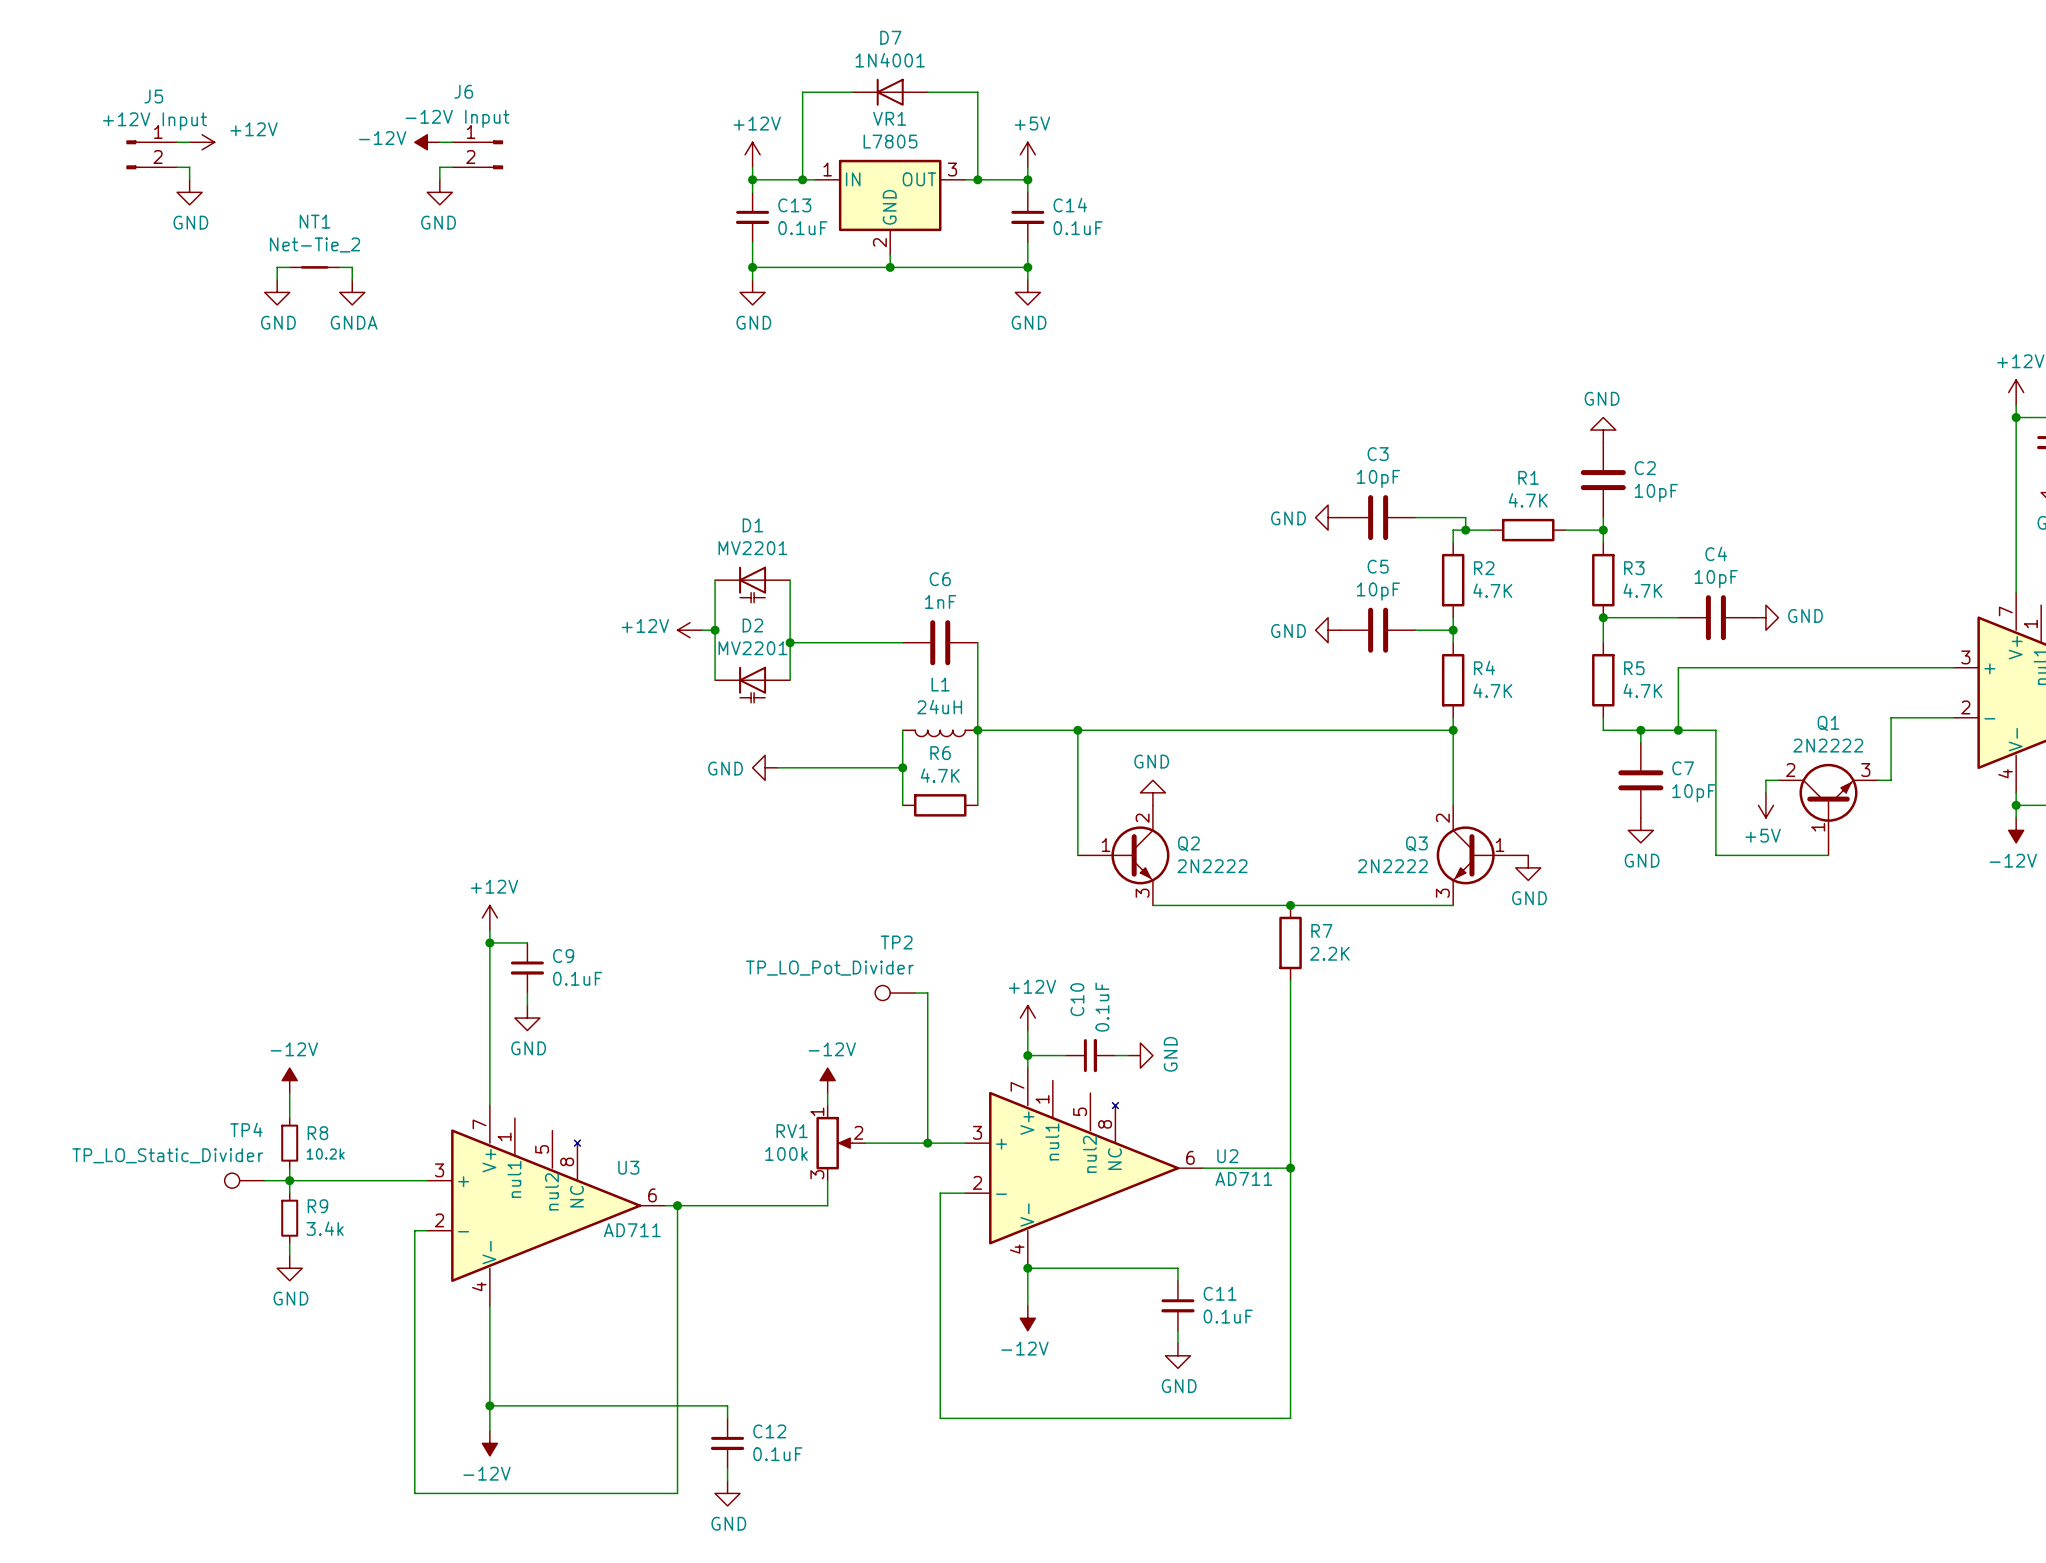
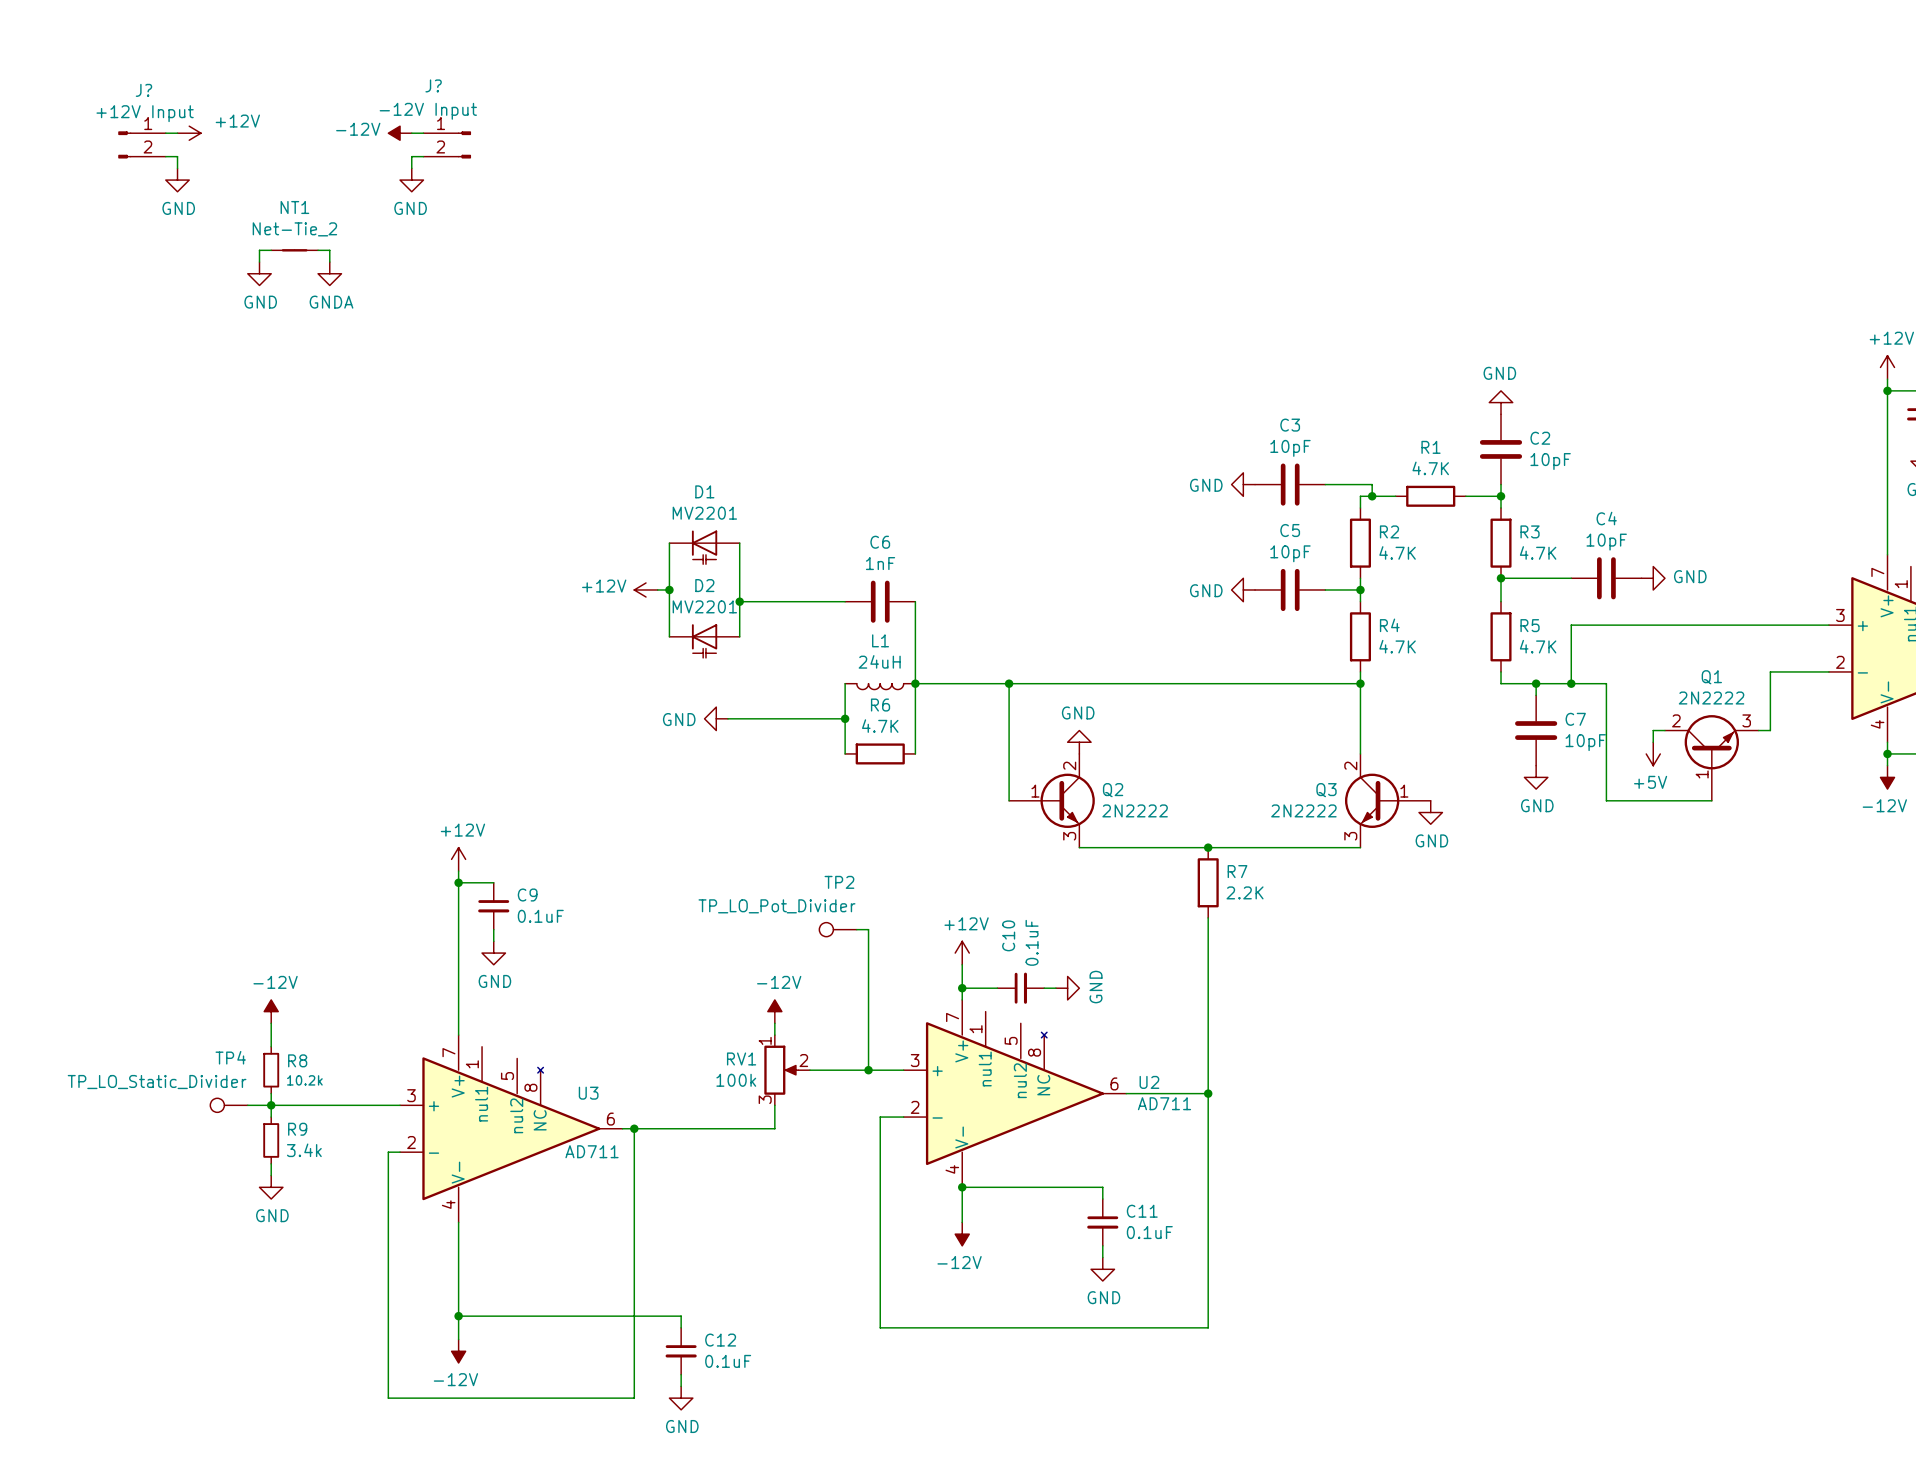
J6 name: J6 (463, 91) -> J? (433, 85)
wire: (852, 92) (802, 92) (802, 179) -> none
D7: 1N4001 (890, 92) -> none
wire: (927, 92) (977, 92) (977, 179) -> none
J5 name: J5 (153, 96) -> J? (143, 90)
power symbol: +12V (752, 154) -> none
power symbol: +5V (1027, 154) -> none
wire: (752, 167) (752, 192) -> none
wire: (1027, 167) (1027, 192) -> none
wire: (752, 179) (815, 179) -> none
junction: (752, 179) -> none
junction: (802, 179) -> none
wire: (965, 179) (1027, 179) -> none
junction: (977, 179) -> none
junction: (1027, 179) -> none
VR1: L7805 (890, 207) -> none
C13: 0.1uF (752, 217) -> none
C14: 0.1uF (1027, 217) -> none
wire: (752, 242) (752, 279) -> none
wire: (1027, 242) (1027, 279) -> none
wire: (890, 254) (890, 267) -> none
wire: (752, 267) (1027, 267) -> none
junction: (752, 267) -> none
junction: (890, 267) -> none
junction: (1027, 267) -> none
power symbol: GND (752, 292) -> none
power symbol: GND (1027, 292) -> none

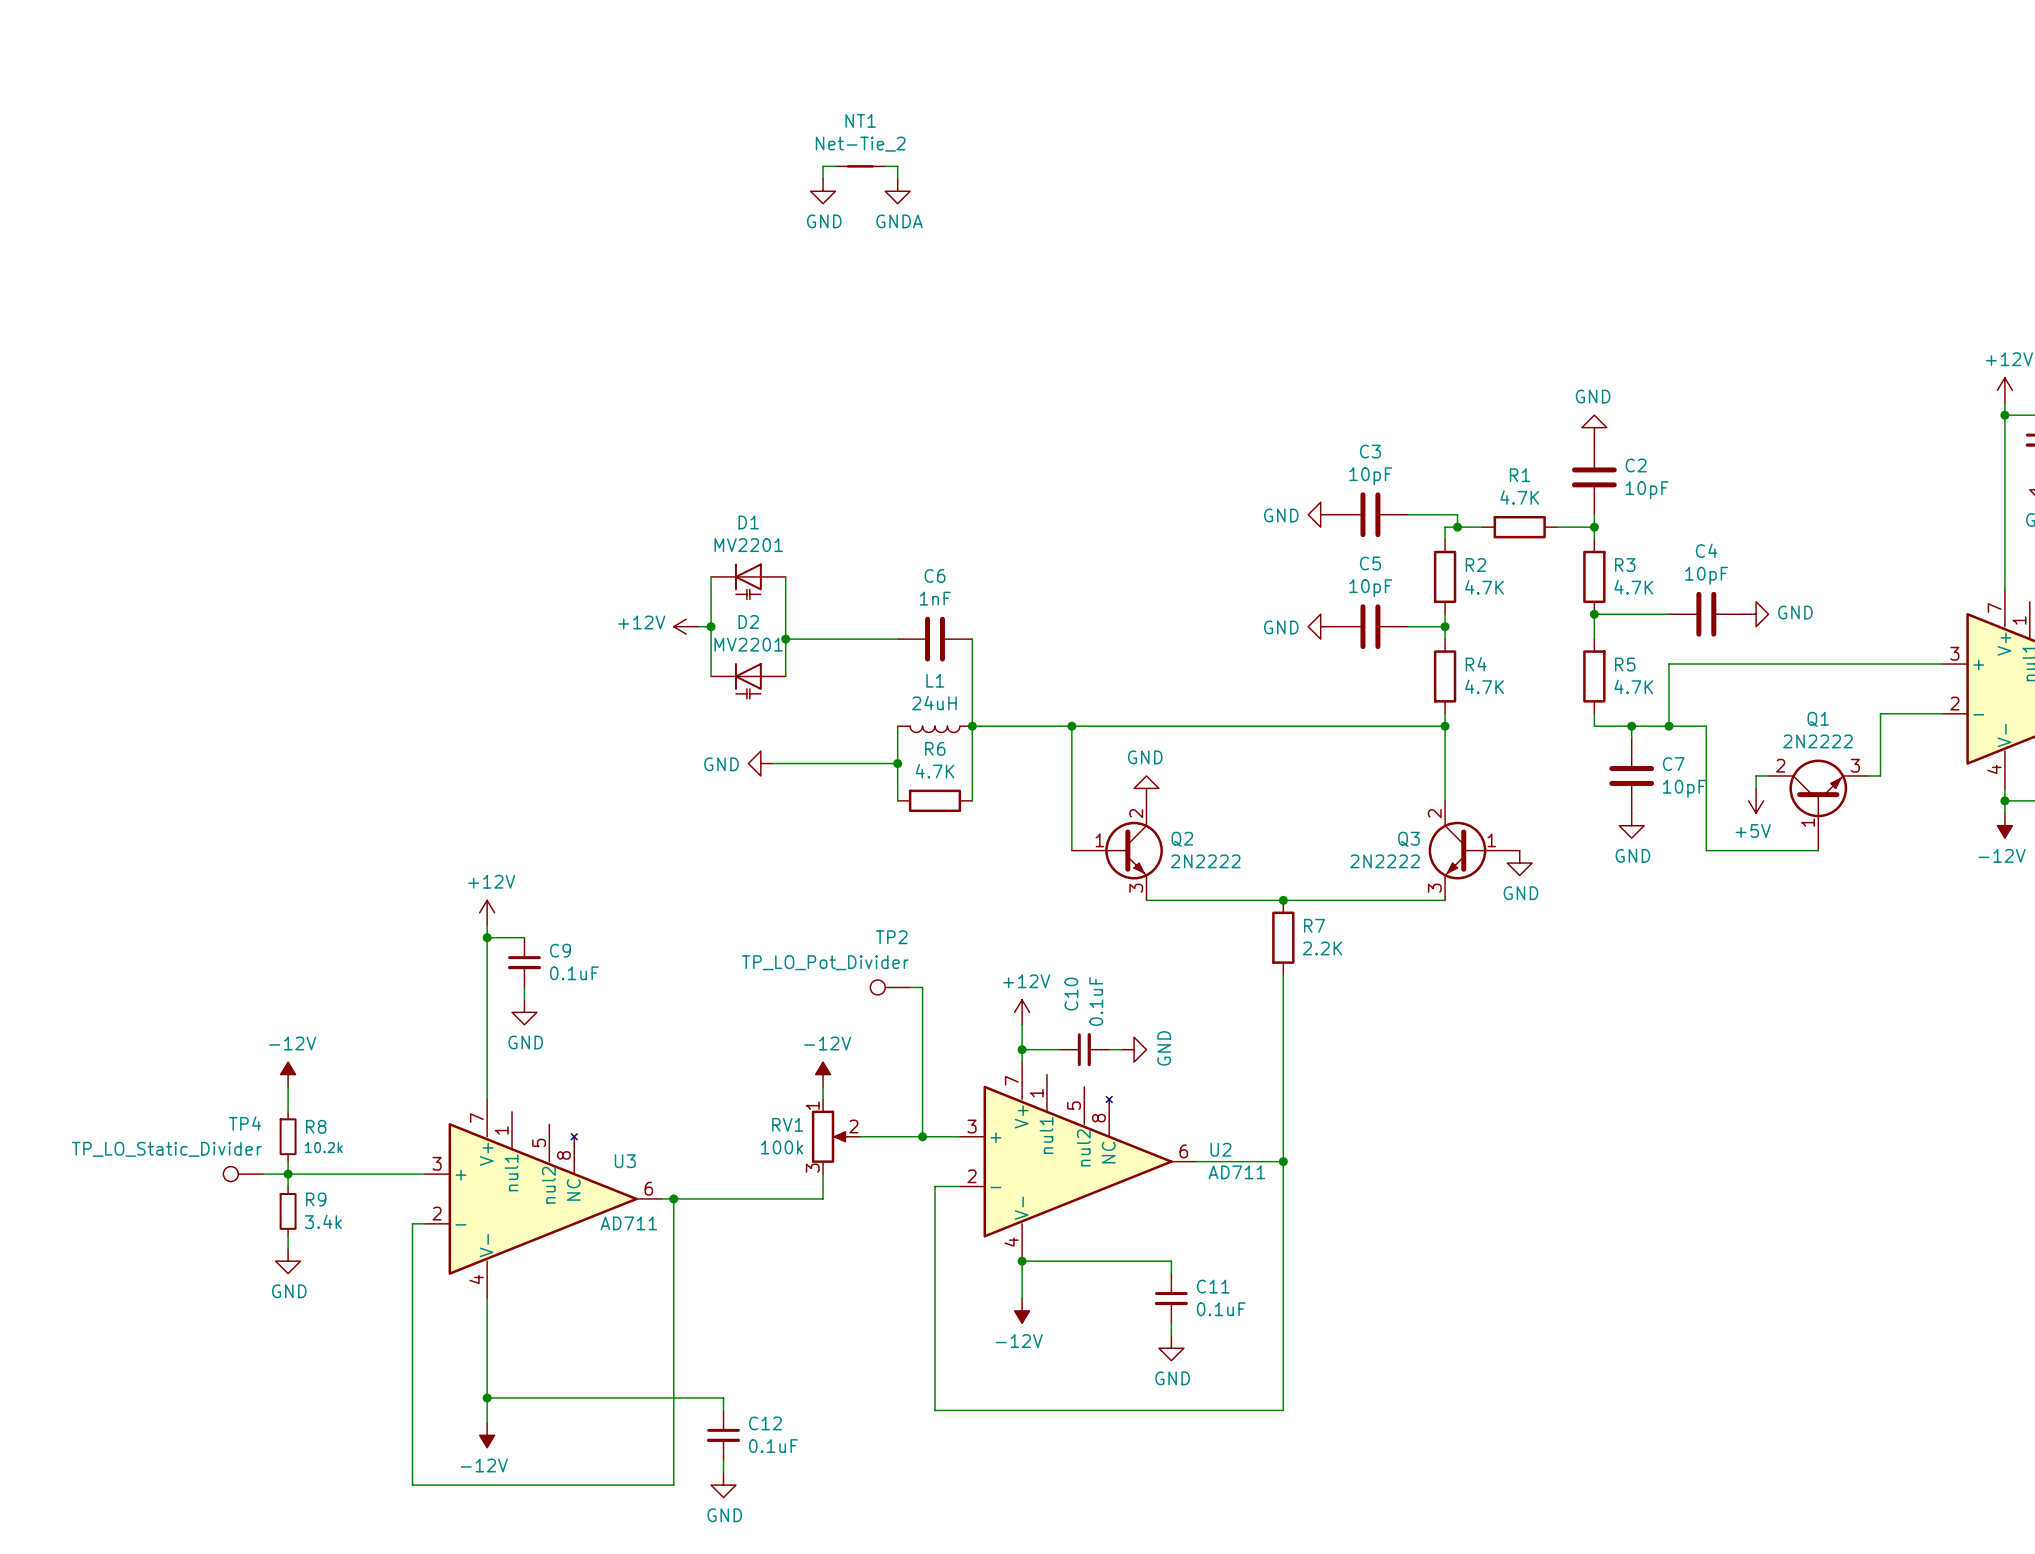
wire: (165, 133) (177, 133) -> none
power symbol: +12V (189, 133) -> none
power symbol: -12V (400, 133) -> none
wire: (411, 133) (423, 133) -> none
J?: +12V Input (142, 144) -> none
J?: -12V Input (447, 144) -> none
wire: (165, 156) (177, 156) (177, 168) -> none
wire: (423, 156) (411, 156) (411, 168) -> none
wire: none -> (835, 166) (823, 166) (823, 178)
wire: none -> (885, 166) (897, 166) (897, 178)
power symbol: GND (177, 180) -> none
power symbol: GND (411, 180) -> none
power symbol: none -> GND (823, 191)
power symbol: none -> GNDA (897, 191)
wire: (271, 250) (259, 250) (259, 262) -> none
NT1 position: (294, 250) -> (860, 166)
wire: (318, 250) (329, 250) (329, 262) -> none
power symbol: GND (259, 273) -> none
power symbol: GNDA (329, 273) -> none

